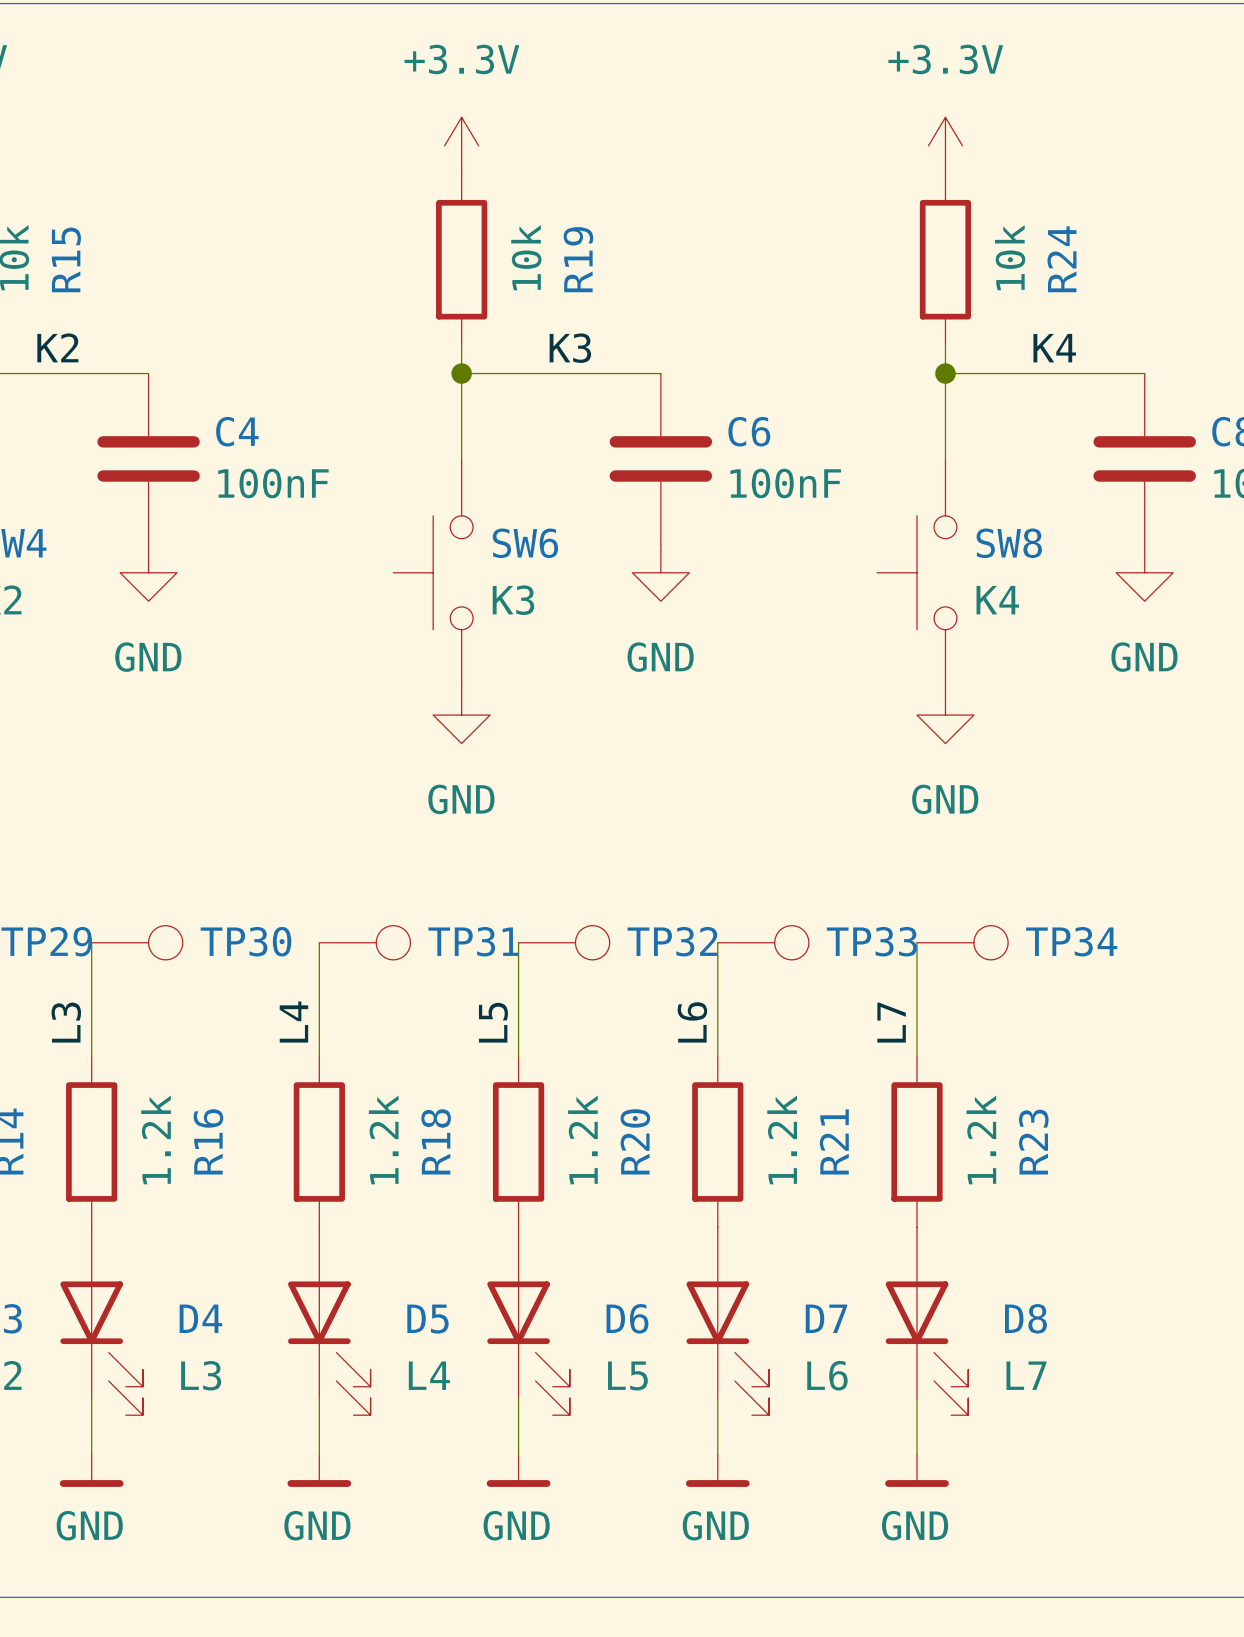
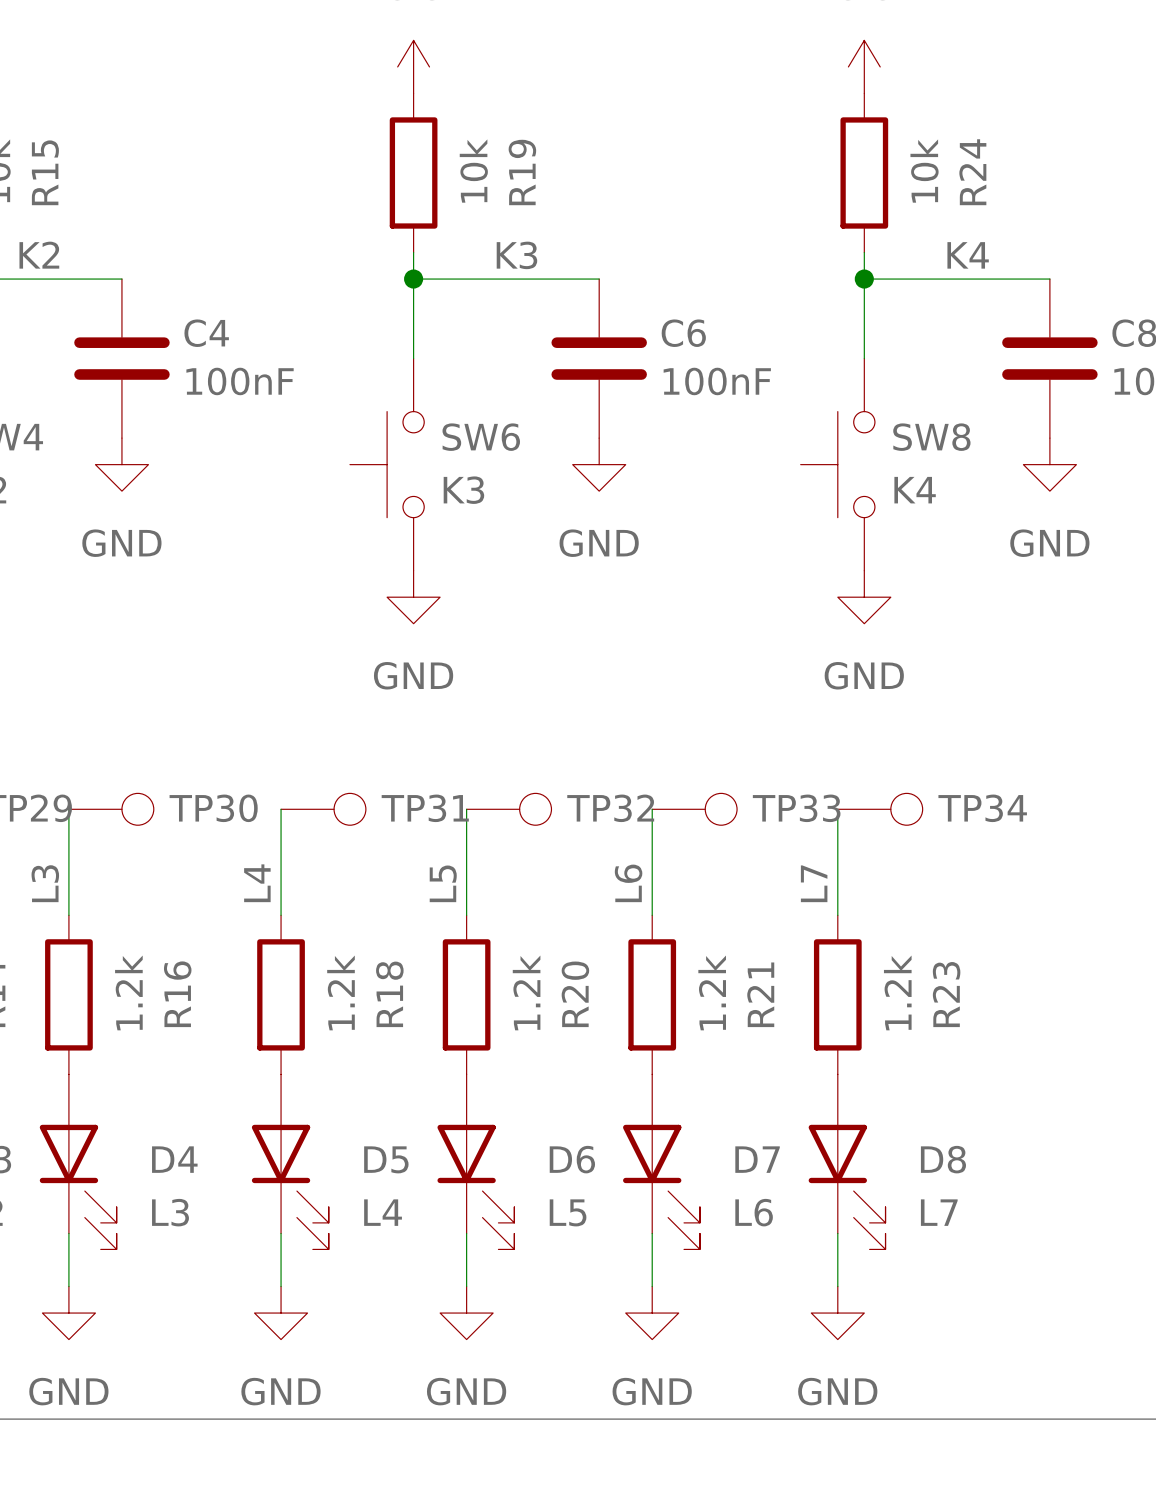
power symbol shape: [59, 1455, 124, 1487] -> [42, 1286, 96, 1340]
power symbol shape: [287, 1455, 352, 1487] -> [254, 1286, 308, 1340]
power symbol shape: [486, 1455, 551, 1487] -> [440, 1286, 494, 1340]
power symbol shape: [685, 1455, 750, 1487] -> [625, 1286, 679, 1340]
power symbol shape: [885, 1455, 949, 1487] -> [811, 1286, 865, 1340]

